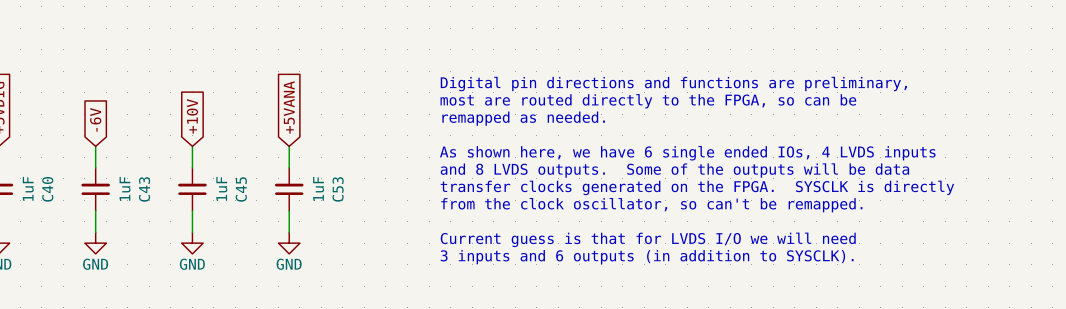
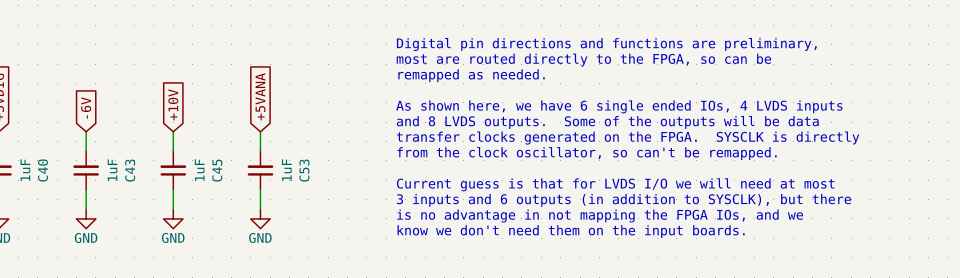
text: none -> Digital pin directions and functions are preliminary, (606, 44)
text: Digital pin directions and functions are preliminary, (673, 84) -> remapped as needed. (471, 75)
text position: most are routed directly to the FPGA, so can be (648, 101) -> most are routed directly to the FPGA, so can be (583, 60)
text: remapped as needed. (523, 118) -> As shown here, we have 6 single ended IOs, 4 LVDS inputs (619, 106)
text: none -> and 8 LVDS outputs. Some of the outputs will be data (607, 122)
text: As shown here, we have 6 single ended IOs, 4 LVDS inputs (687, 153) -> transfer clocks generated on the FPGA. SYSCLK is directly (628, 138)
text: and 8 LVDS outputs. Some of the outputs will be data (674, 170) -> from the clock oscillator, so can't be remapped. (586, 153)
text: transfer clocks generated on the FPGA. SYSCLK is directly (697, 187) -> none
text: from the clock oscillator, so can't be remapped. (651, 205) -> Current guess is that for LVDS I/O we will need at most (615, 184)
text: none -> 3 inputs and 6 outputs (in addition to SYSCLK), but there (623, 200)
text: Current guess is that for LVDS I/O we will need (648, 239) -> is no advantage in not mapping the FPGA IOs, and we (600, 216)
text: 3 inputs and 6 outputs (in addition to SYSCLK). (647, 257) -> know we don't need them on the input boards. (571, 231)

